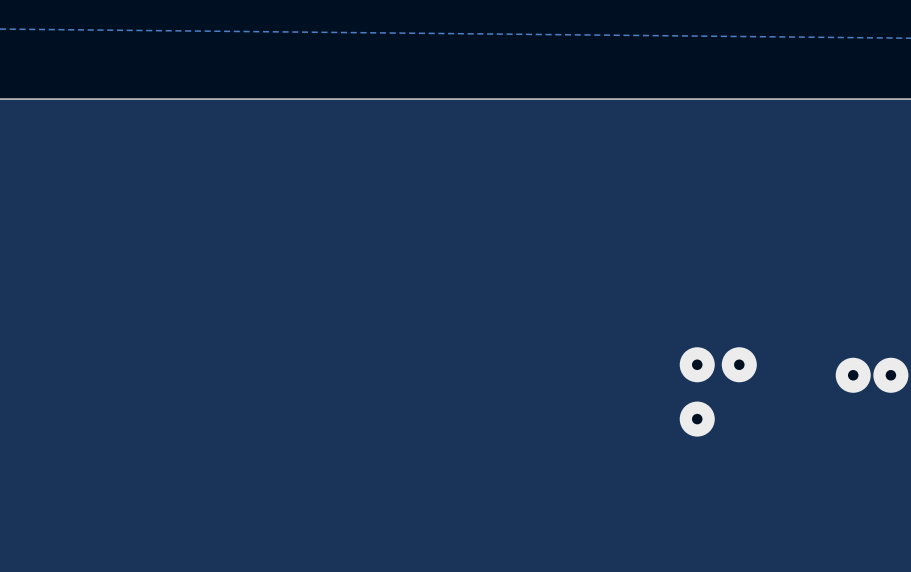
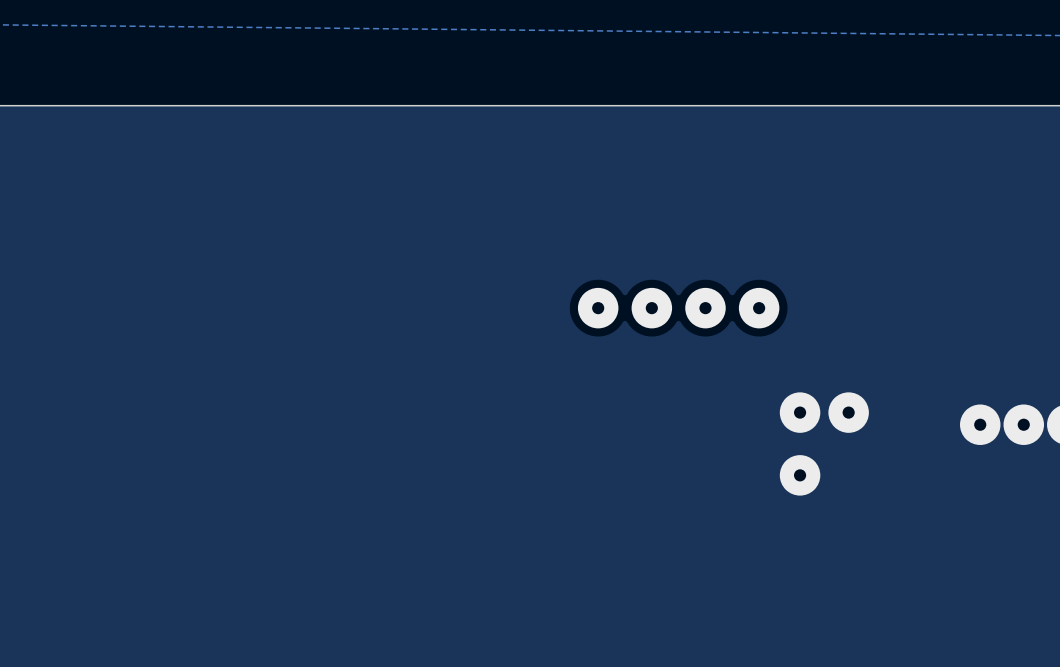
via: none -> (598, 308)
via: none -> (651, 308)
via: none -> (705, 308)
via: none -> (759, 308)

